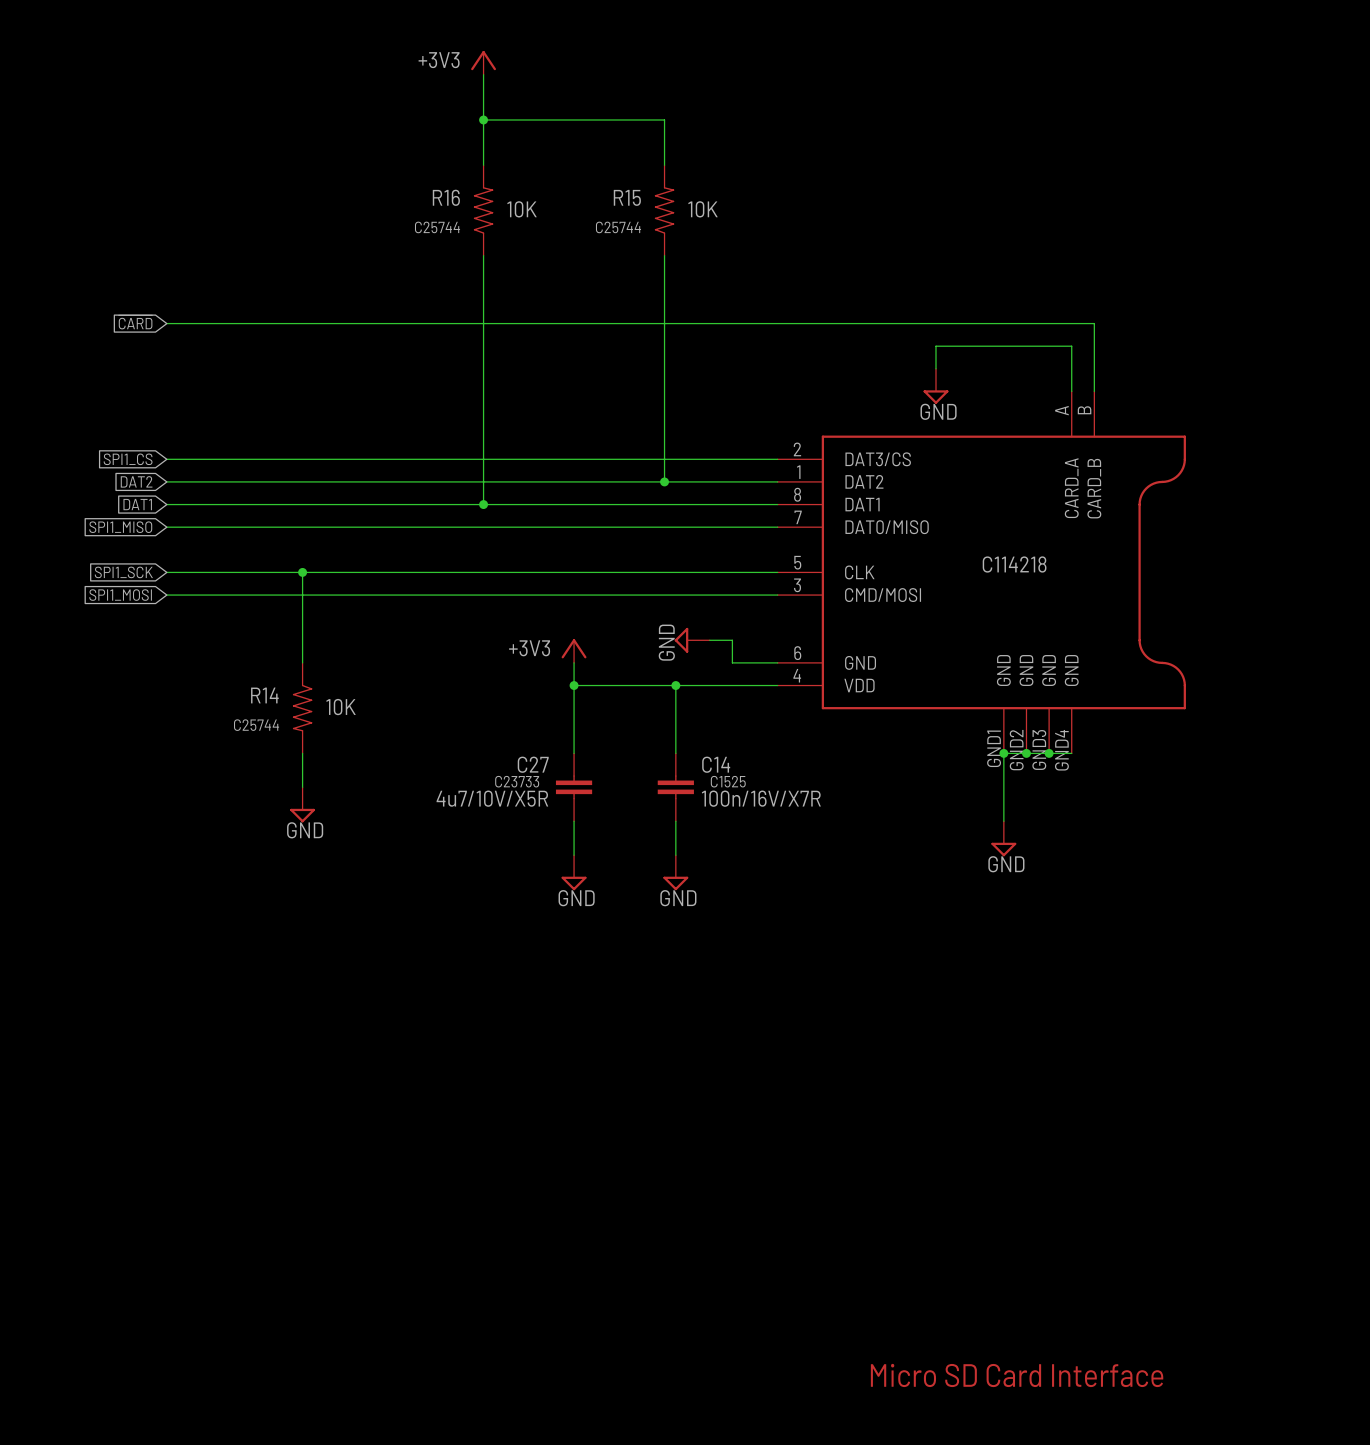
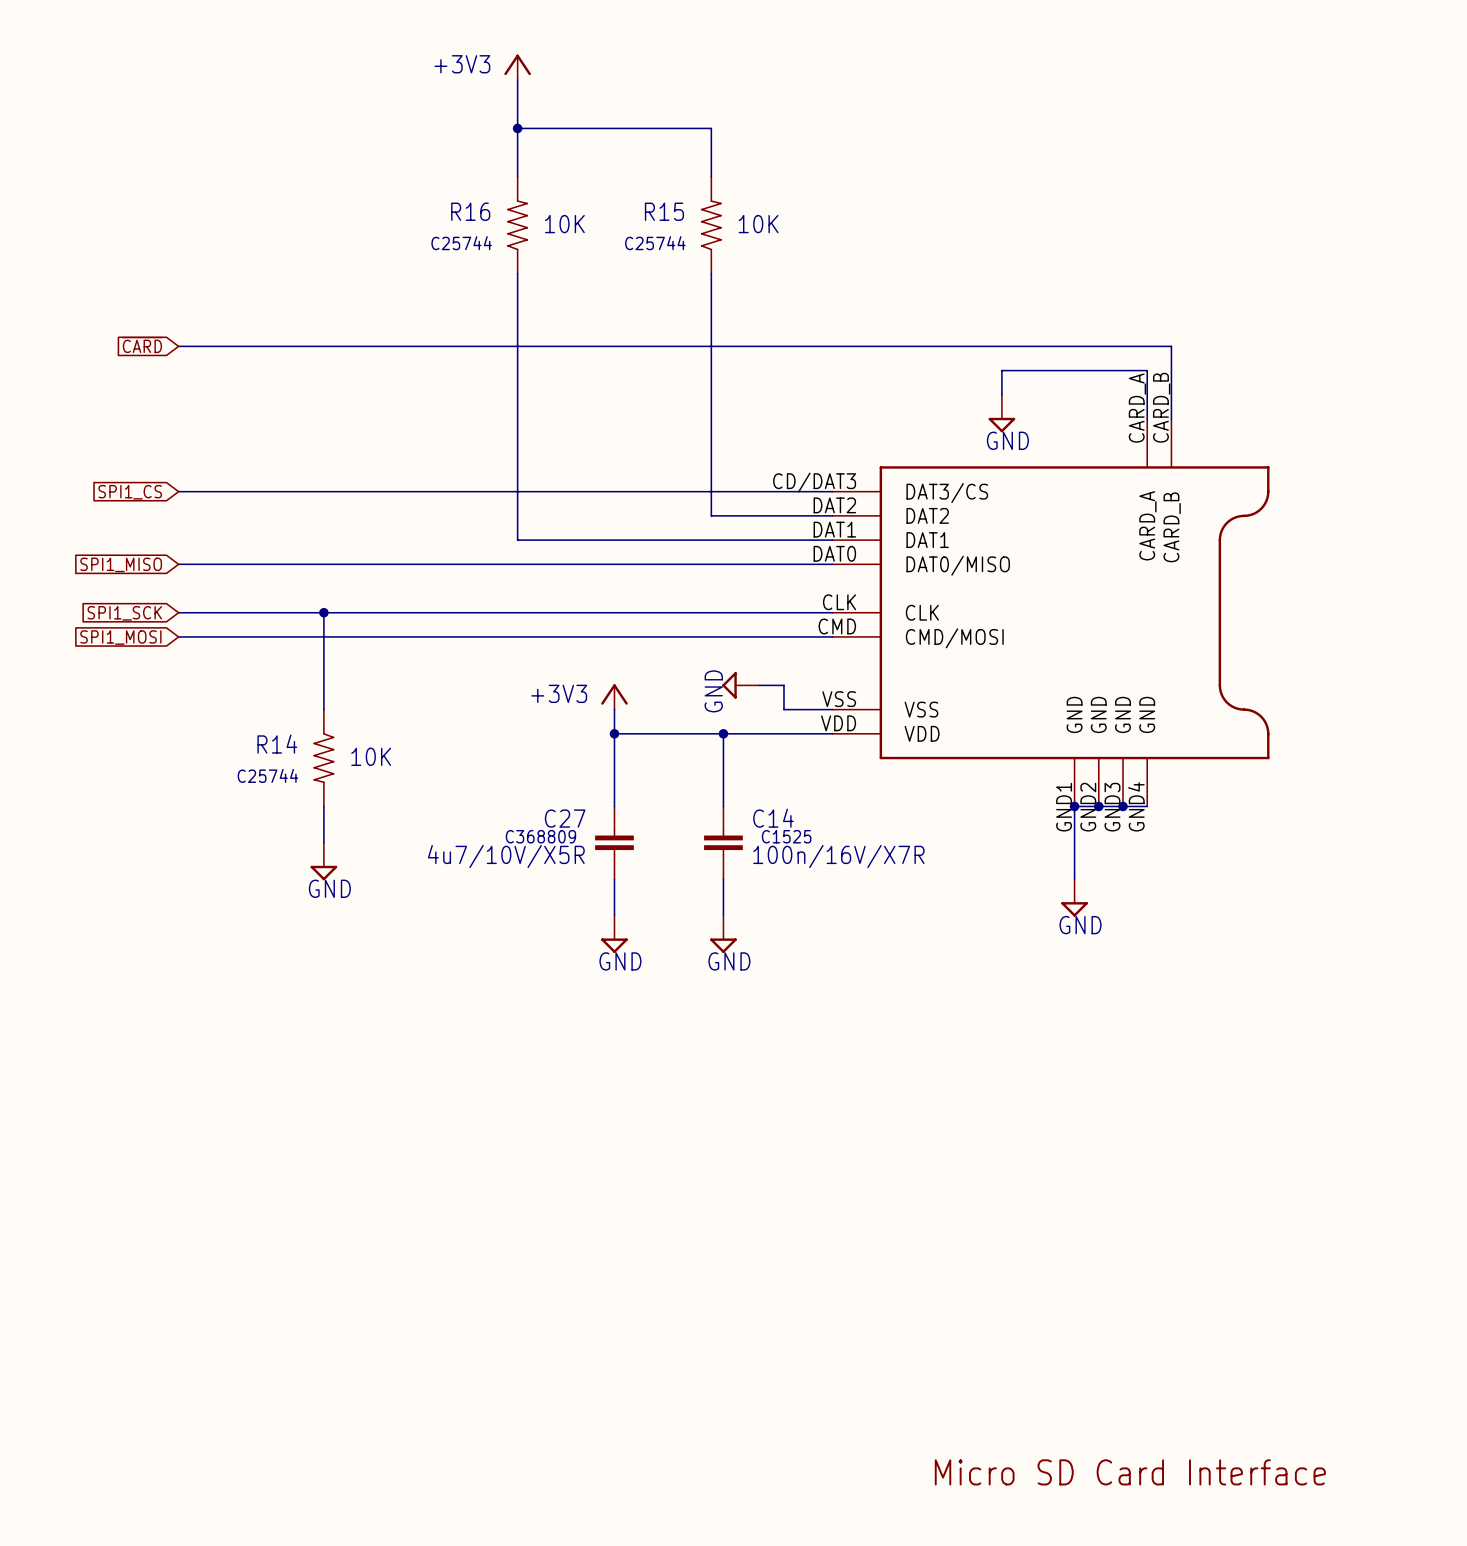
part symbol: [777, 391, 1186, 754] -> [832, 419, 1270, 807]
global label: DAT2 (136, 481) -> none
wire: (166, 481) (664, 481) -> none
junction: (664, 481) -> none
global label: DAT1 (137, 504) -> none
wire: (166, 504) (483, 504) -> none
junction: (483, 504) -> none
part text: C114218 (1014, 564) -> none
C27 text: C23733 (517, 781) -> C368809 (540, 836)

